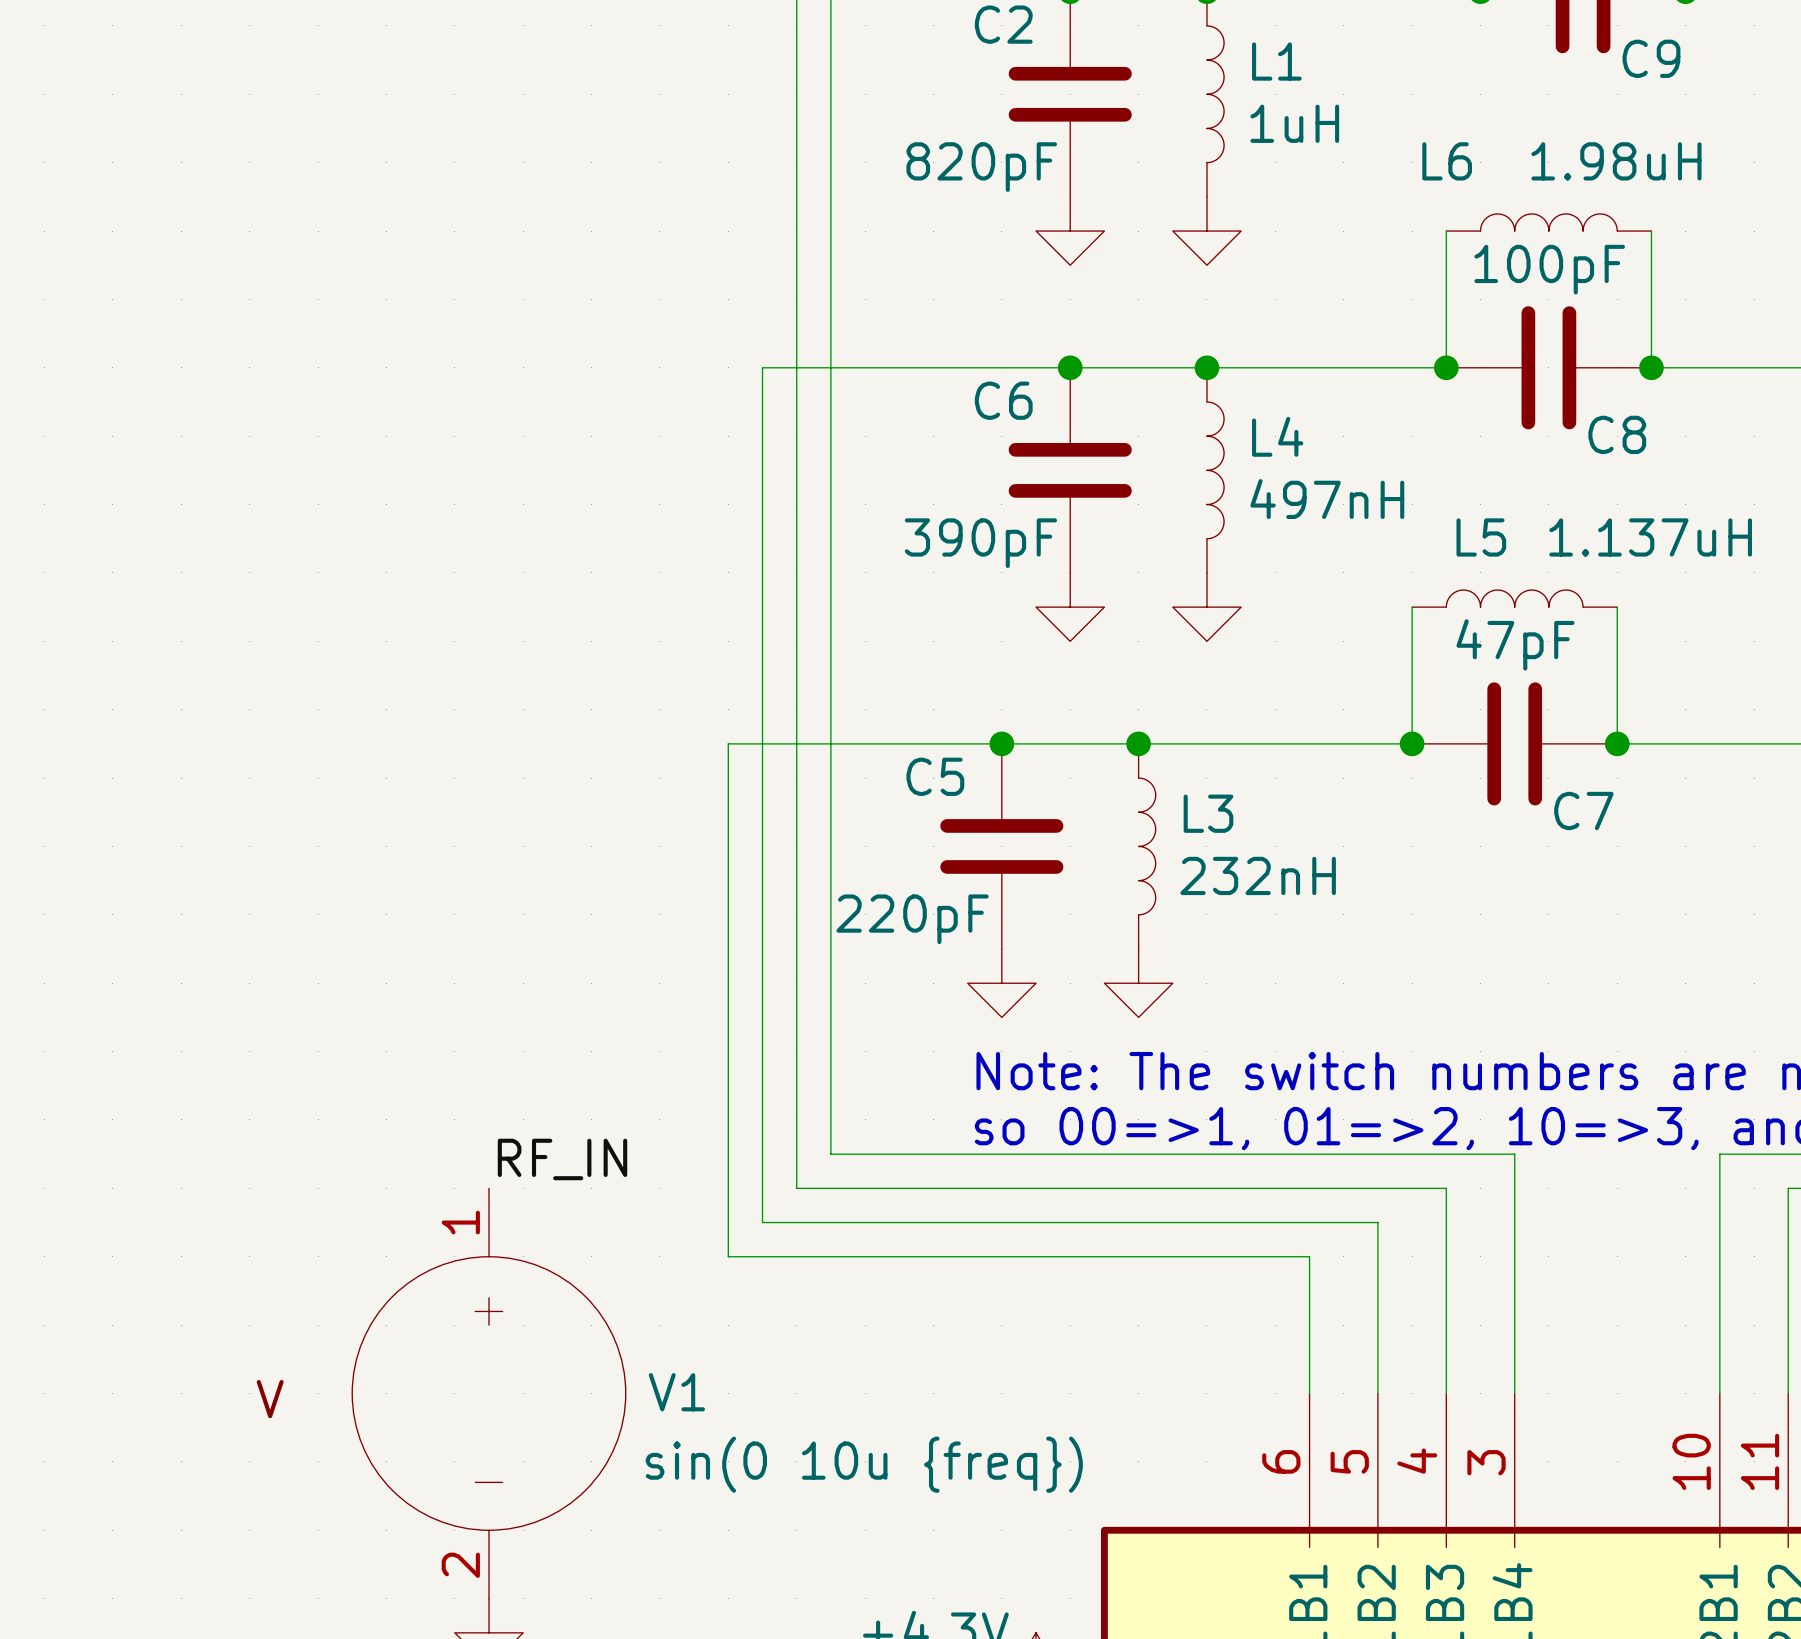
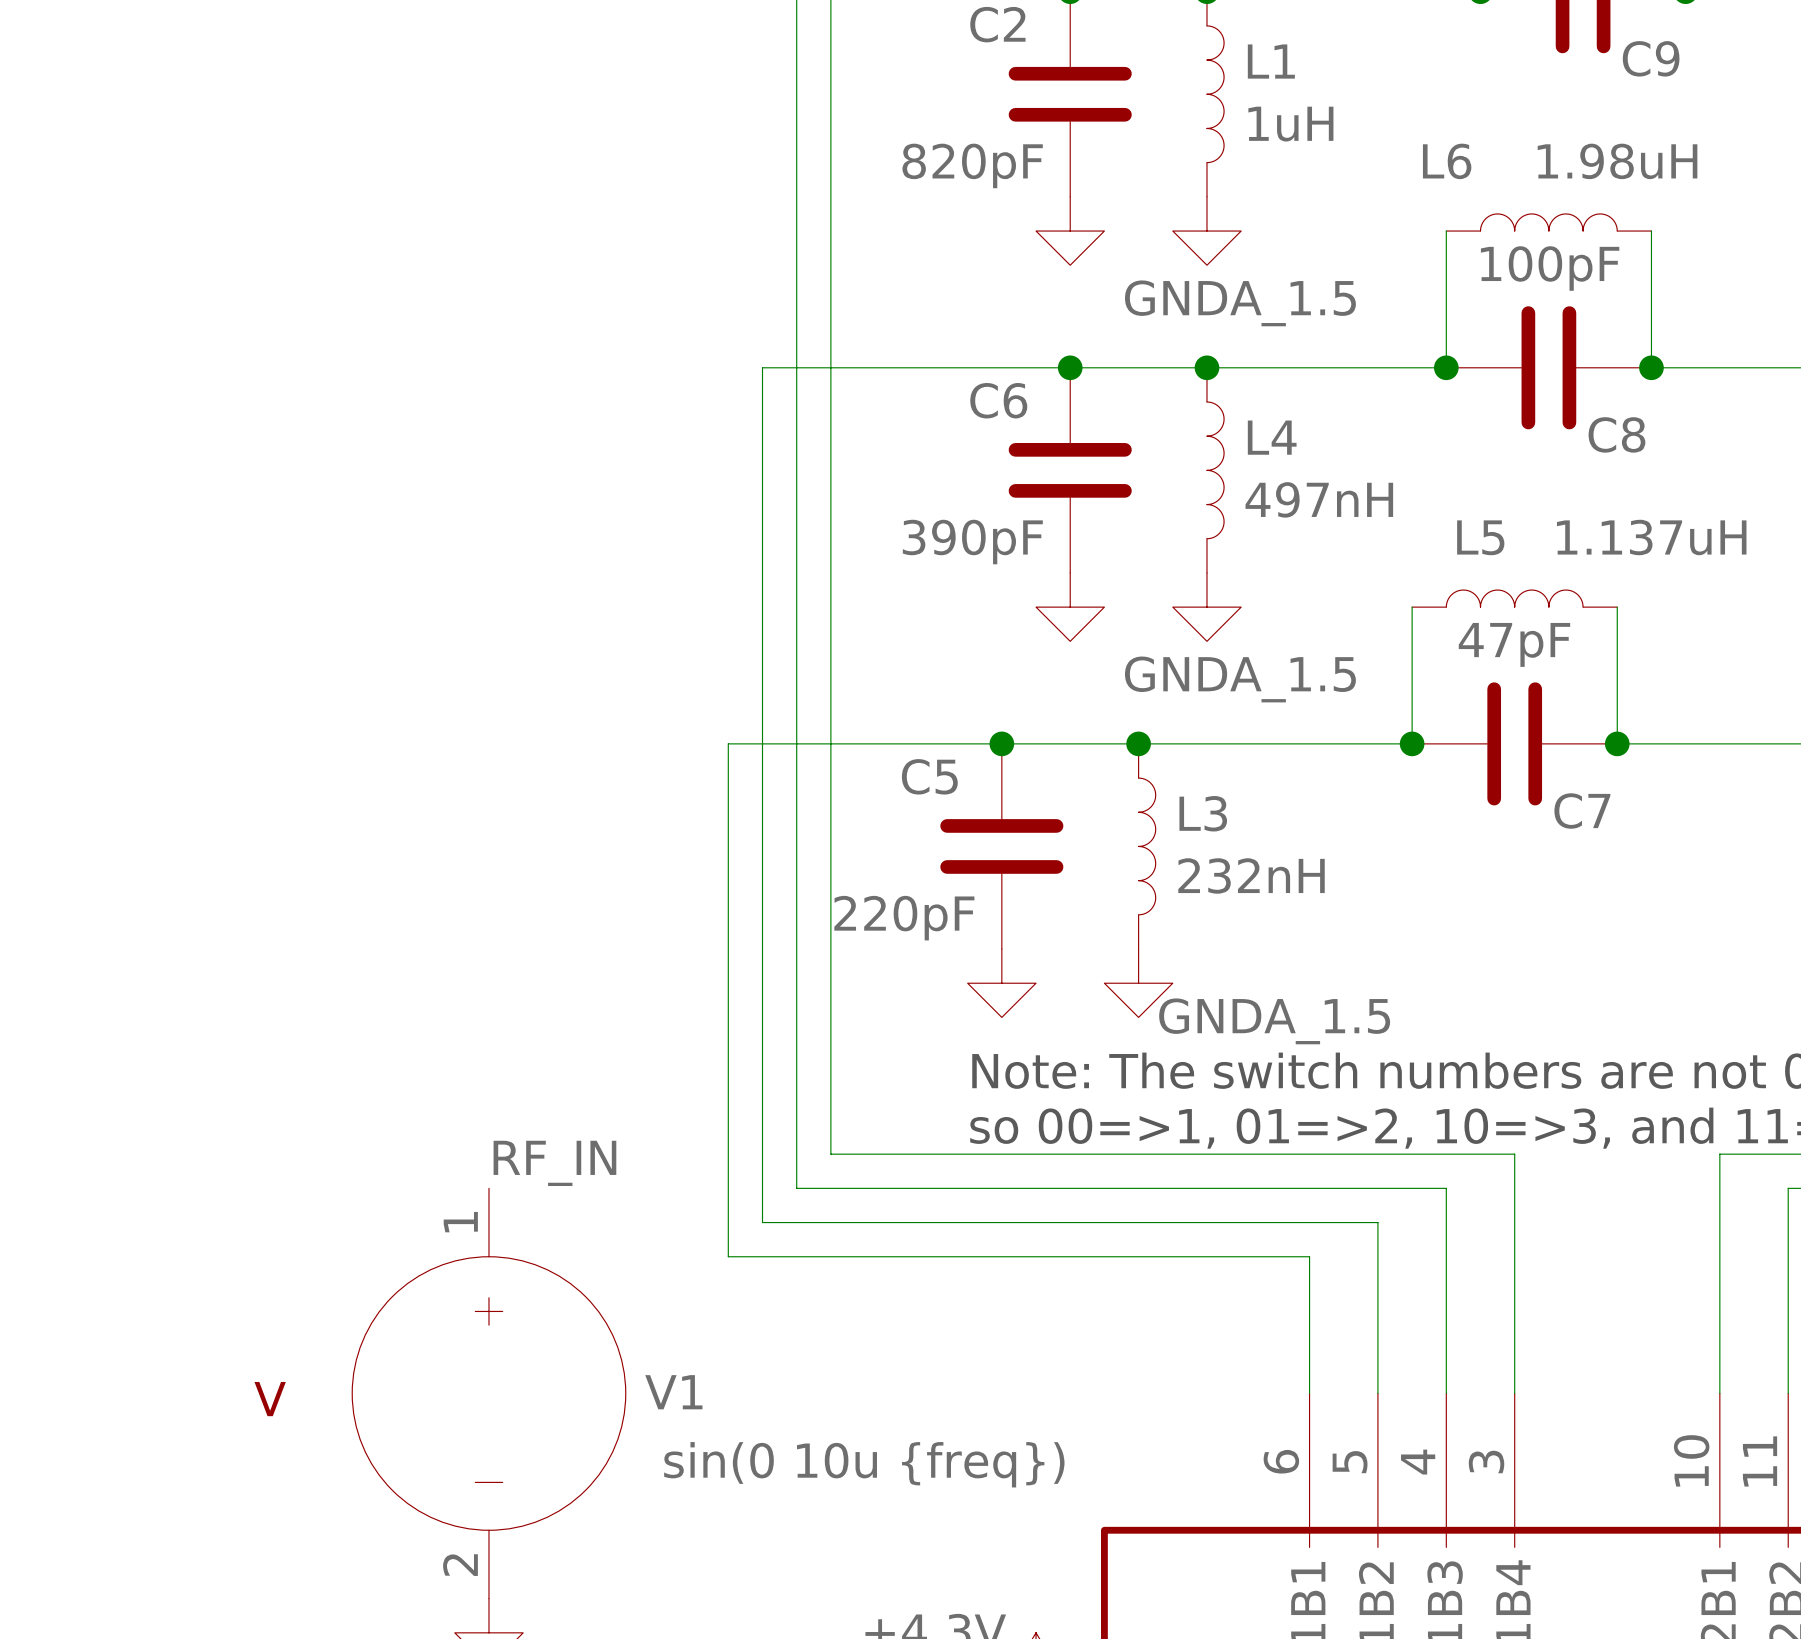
power symbol text: none -> GNDA_1.5 (1240, 303)
power symbol text: none -> GNDA_1.5 (1240, 679)
power symbol text: none -> GNDA_1.5 (1274, 1021)

